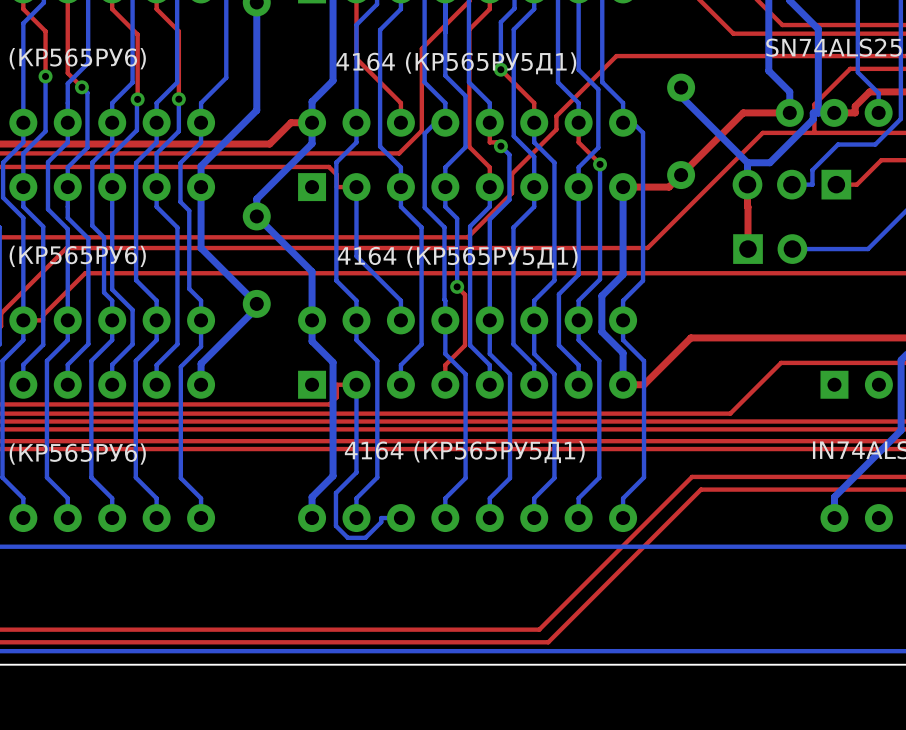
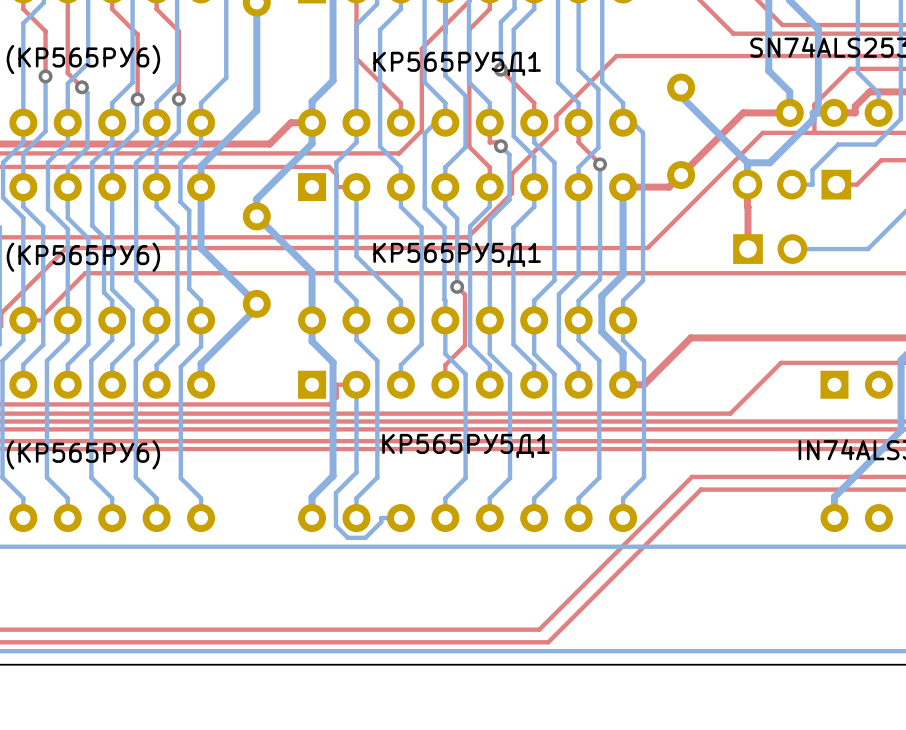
text: 4164 (КР565РУ5Д1) (456, 63) -> КР565РУ5Д1 (457, 63)
text: 4164 (КР565РУ5Д1) (457, 257) -> КР565РУ5Д1 (457, 254)
text: 4164 (КР565РУ5Д1) (464, 452) -> КР565РУ5Д1 (466, 445)

